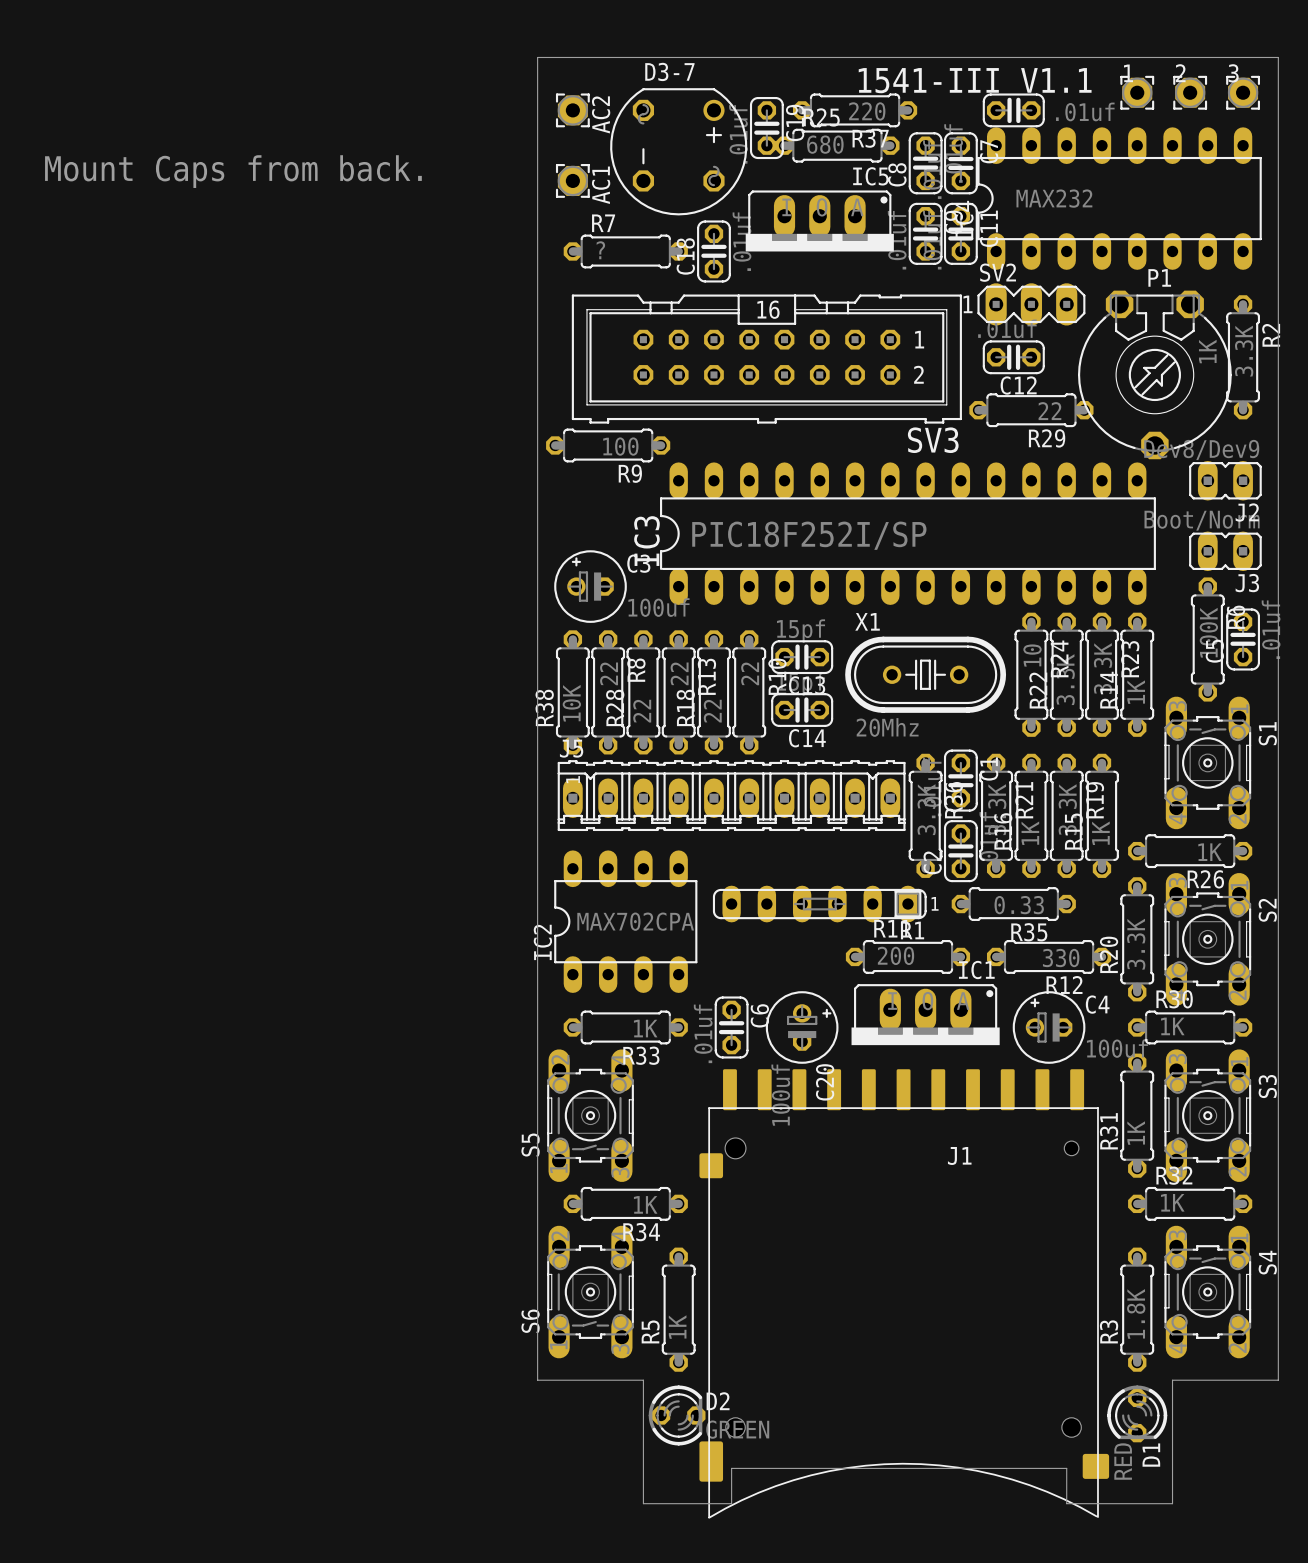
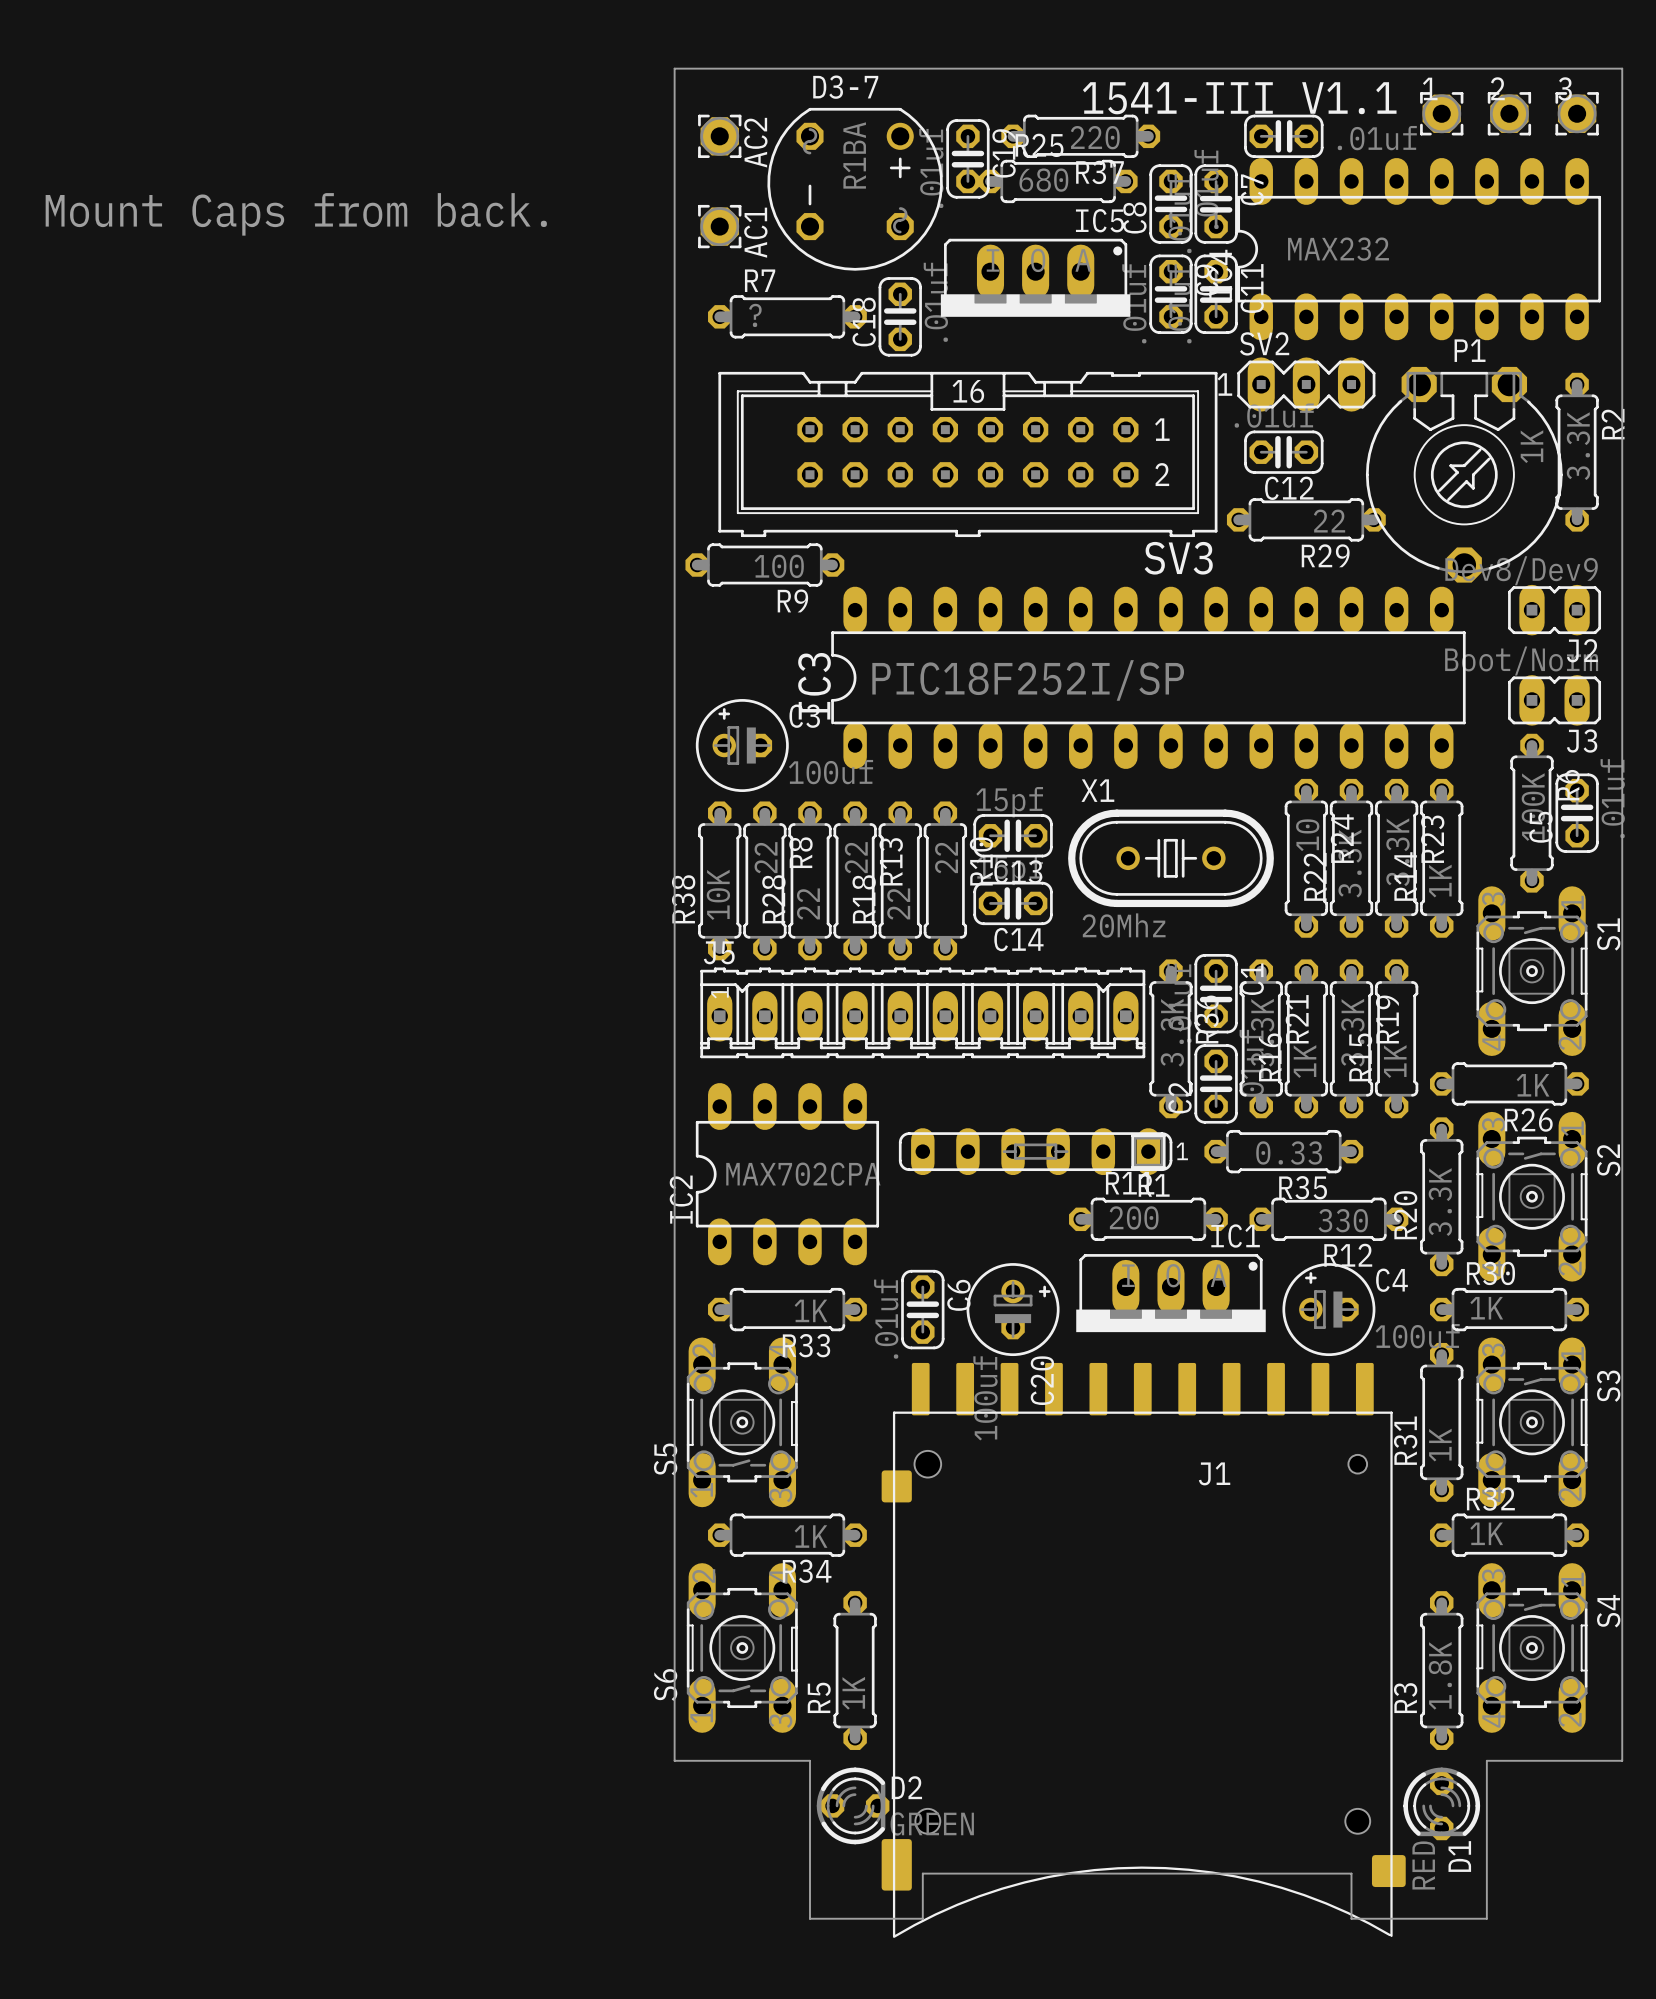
D3-7 value: none -> R1BA (854, 155)

